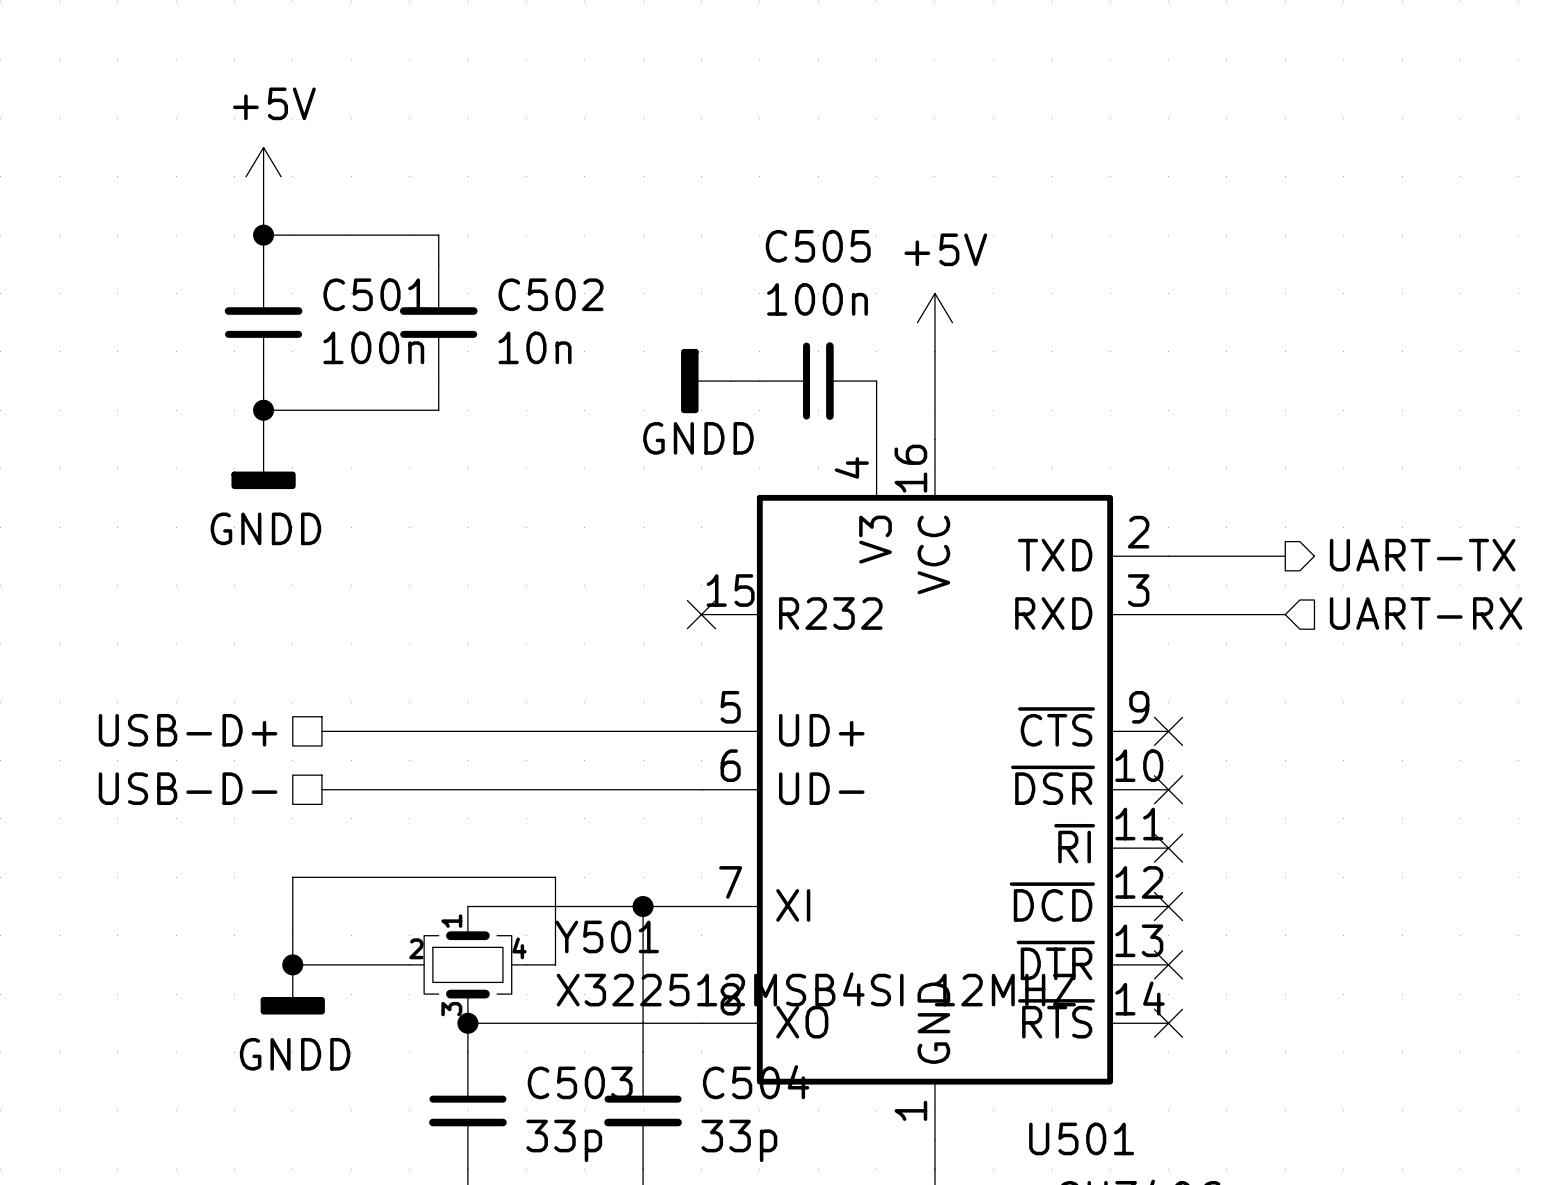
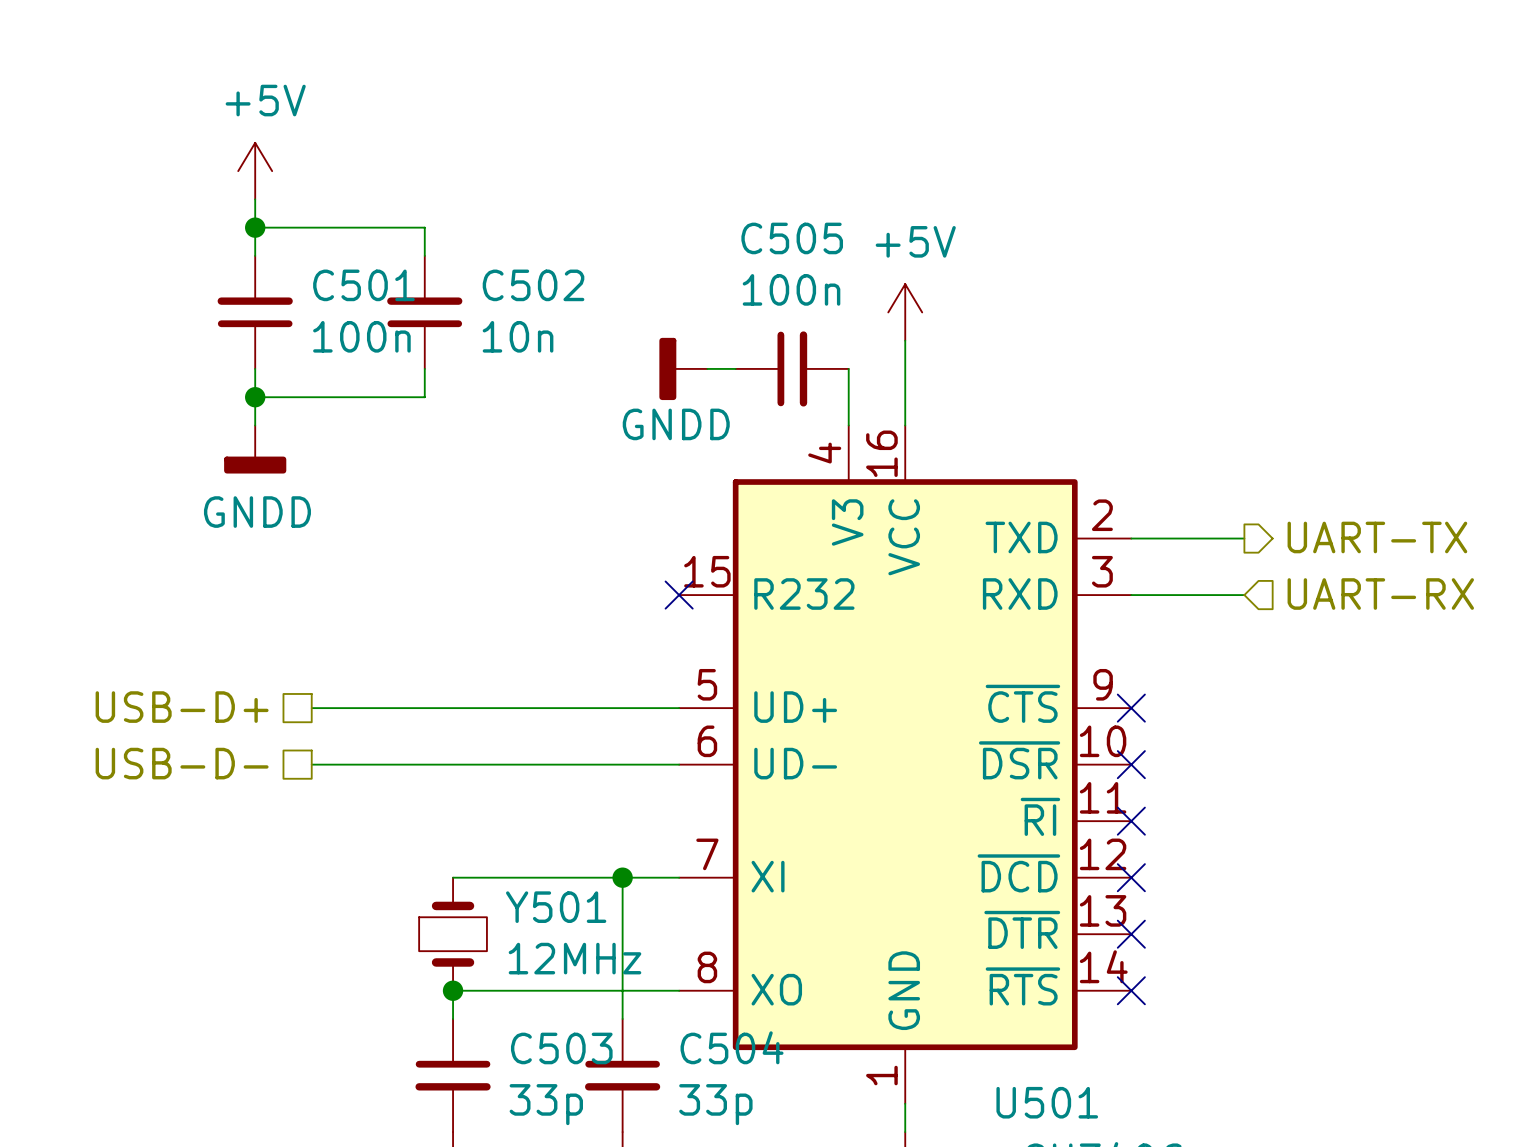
Y501 symbol: [409, 906, 527, 1024] -> [419, 877, 487, 991]
junction: (292, 964) -> none
wire: (409, 964) (292, 964) (292, 877) (555, 877) (555, 964) (526, 964) -> none
power symbol: GNDD (292, 989) -> none
Y501 value: X322512MSB4SI 12MHZ (816, 989) -> 12MHz (575, 958)

